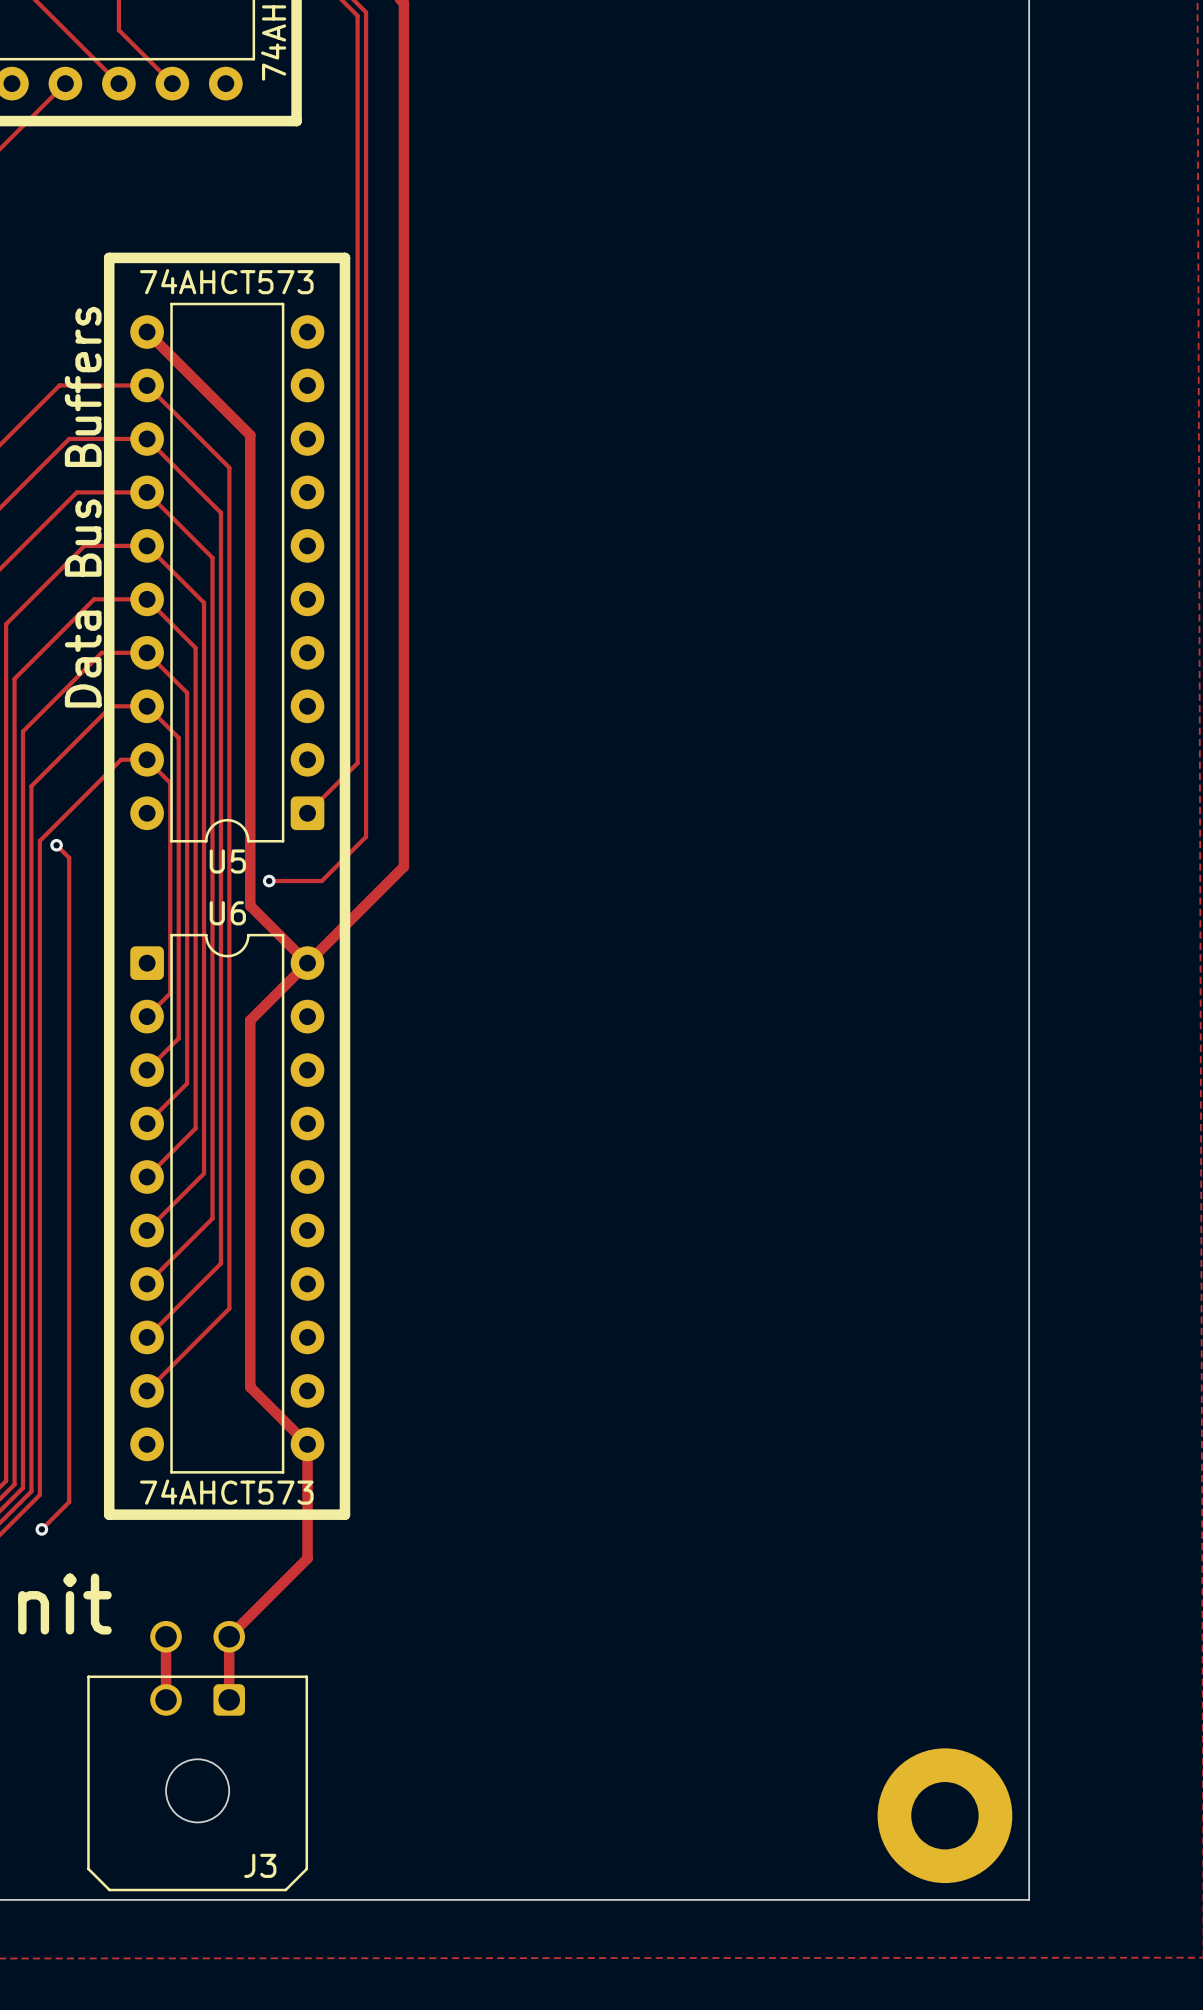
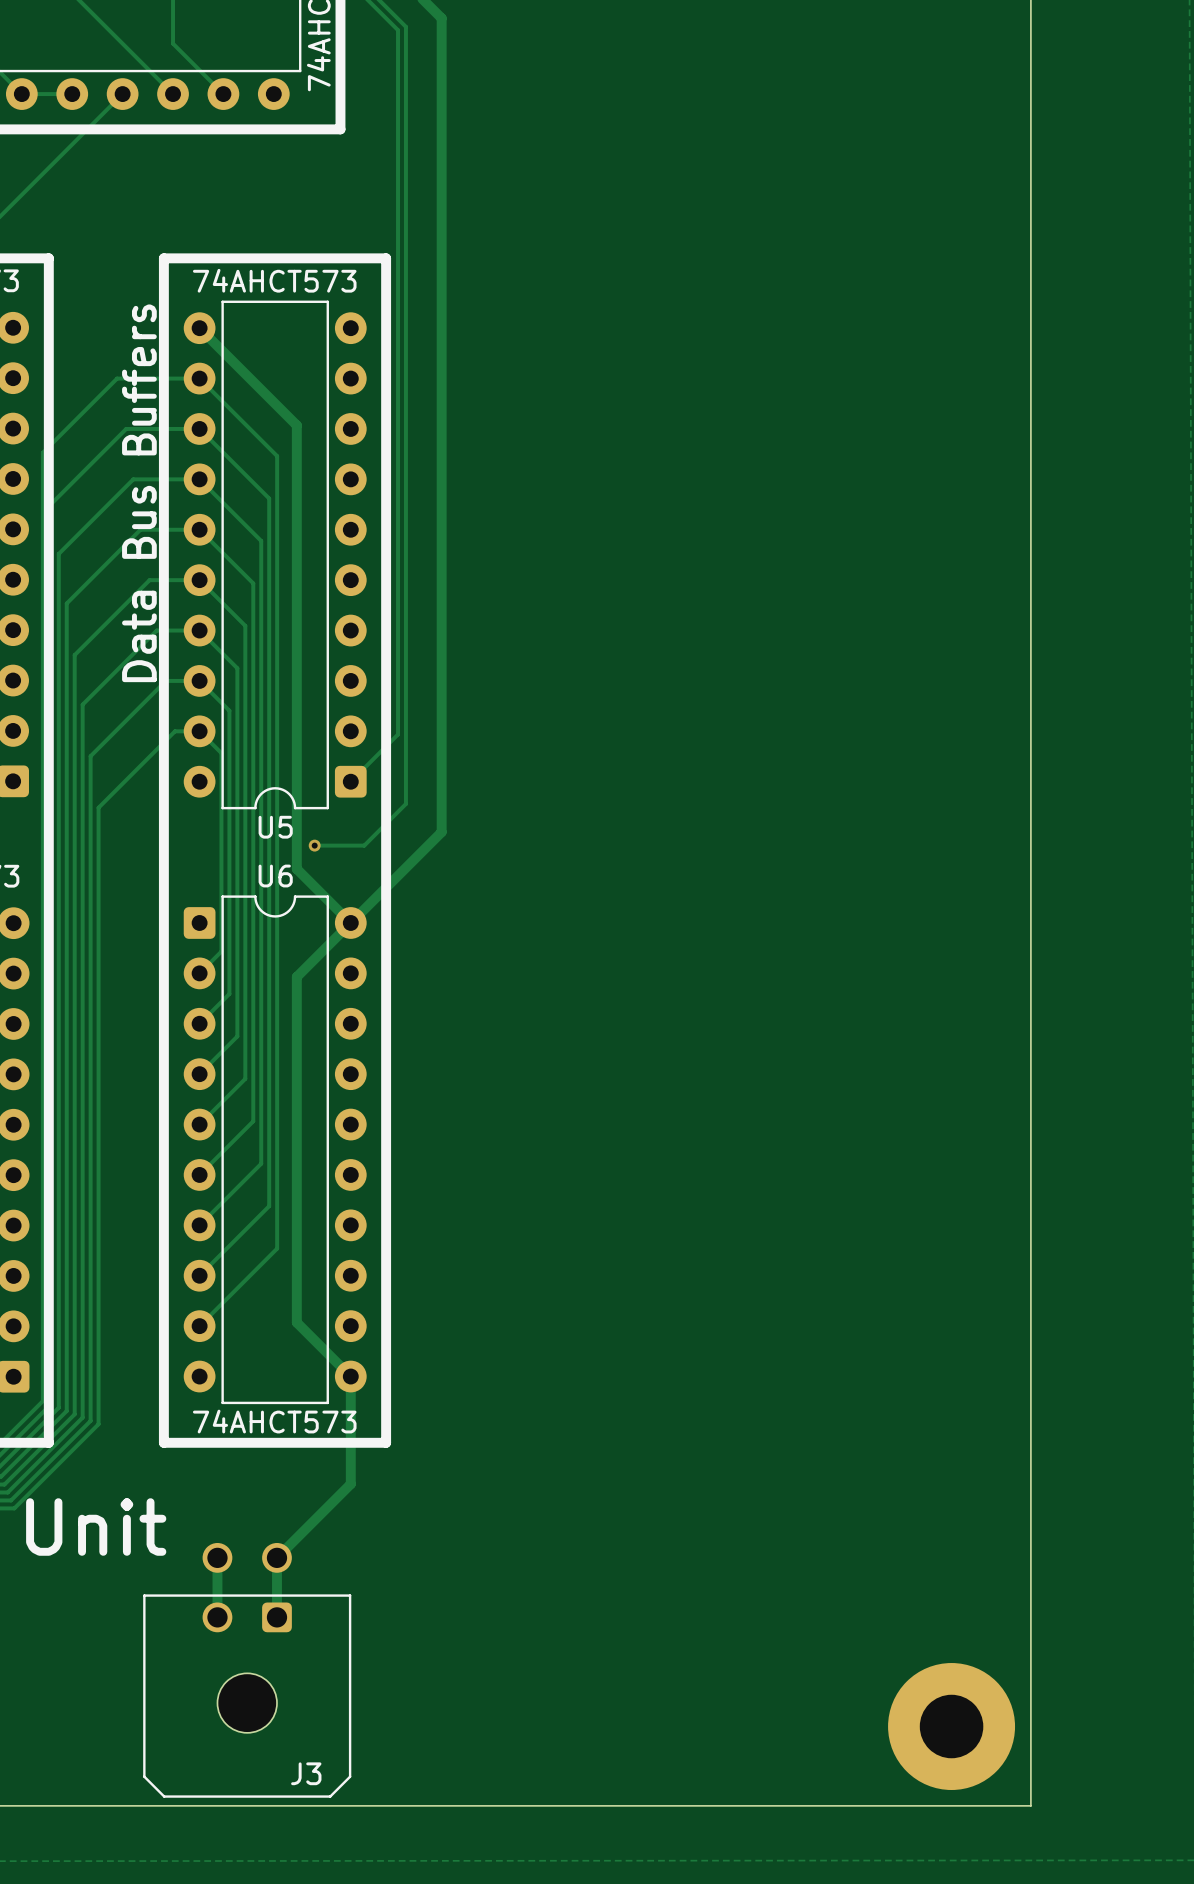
track: (56, 845) (69, 857) (69, 1502) (41, 1529) -> none
via: (56, 845) -> none
via: (41, 1529) -> none

